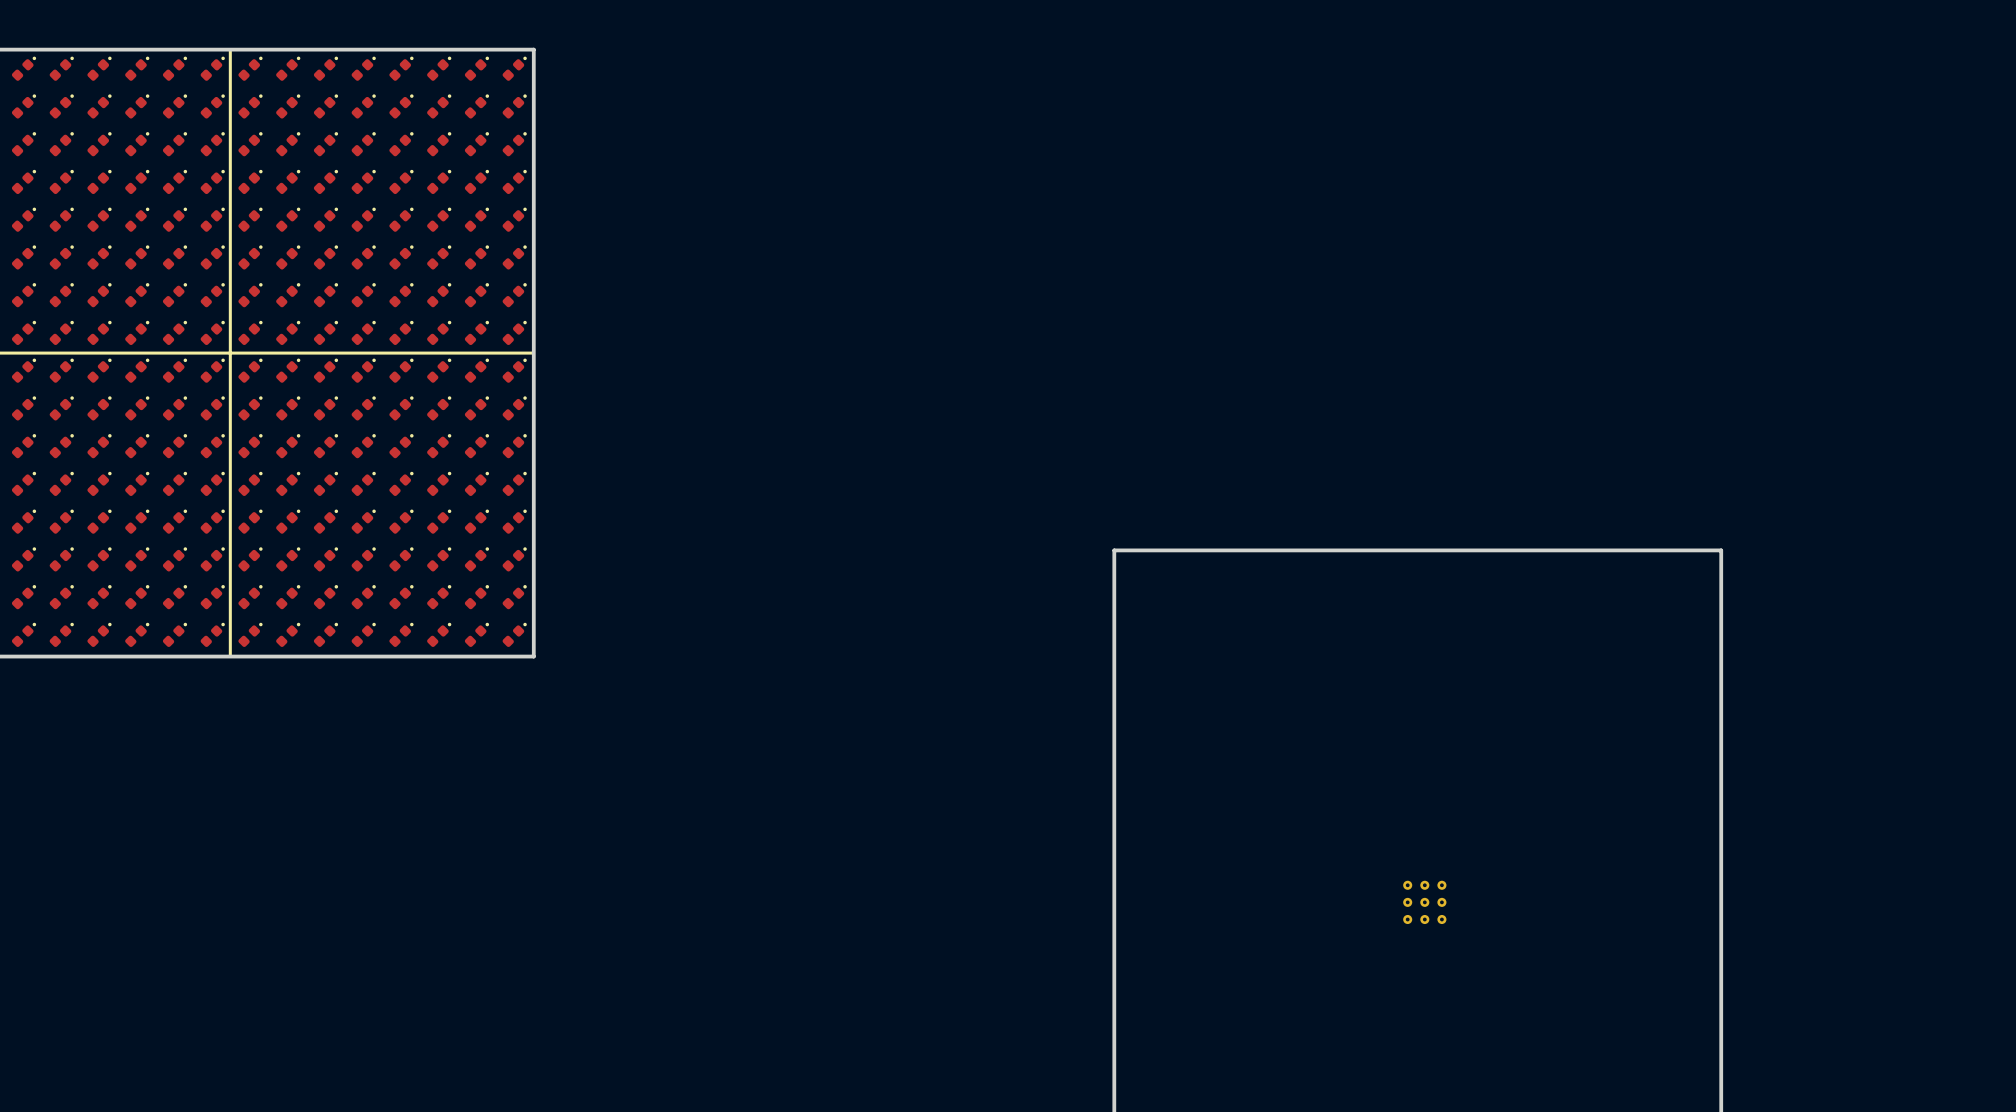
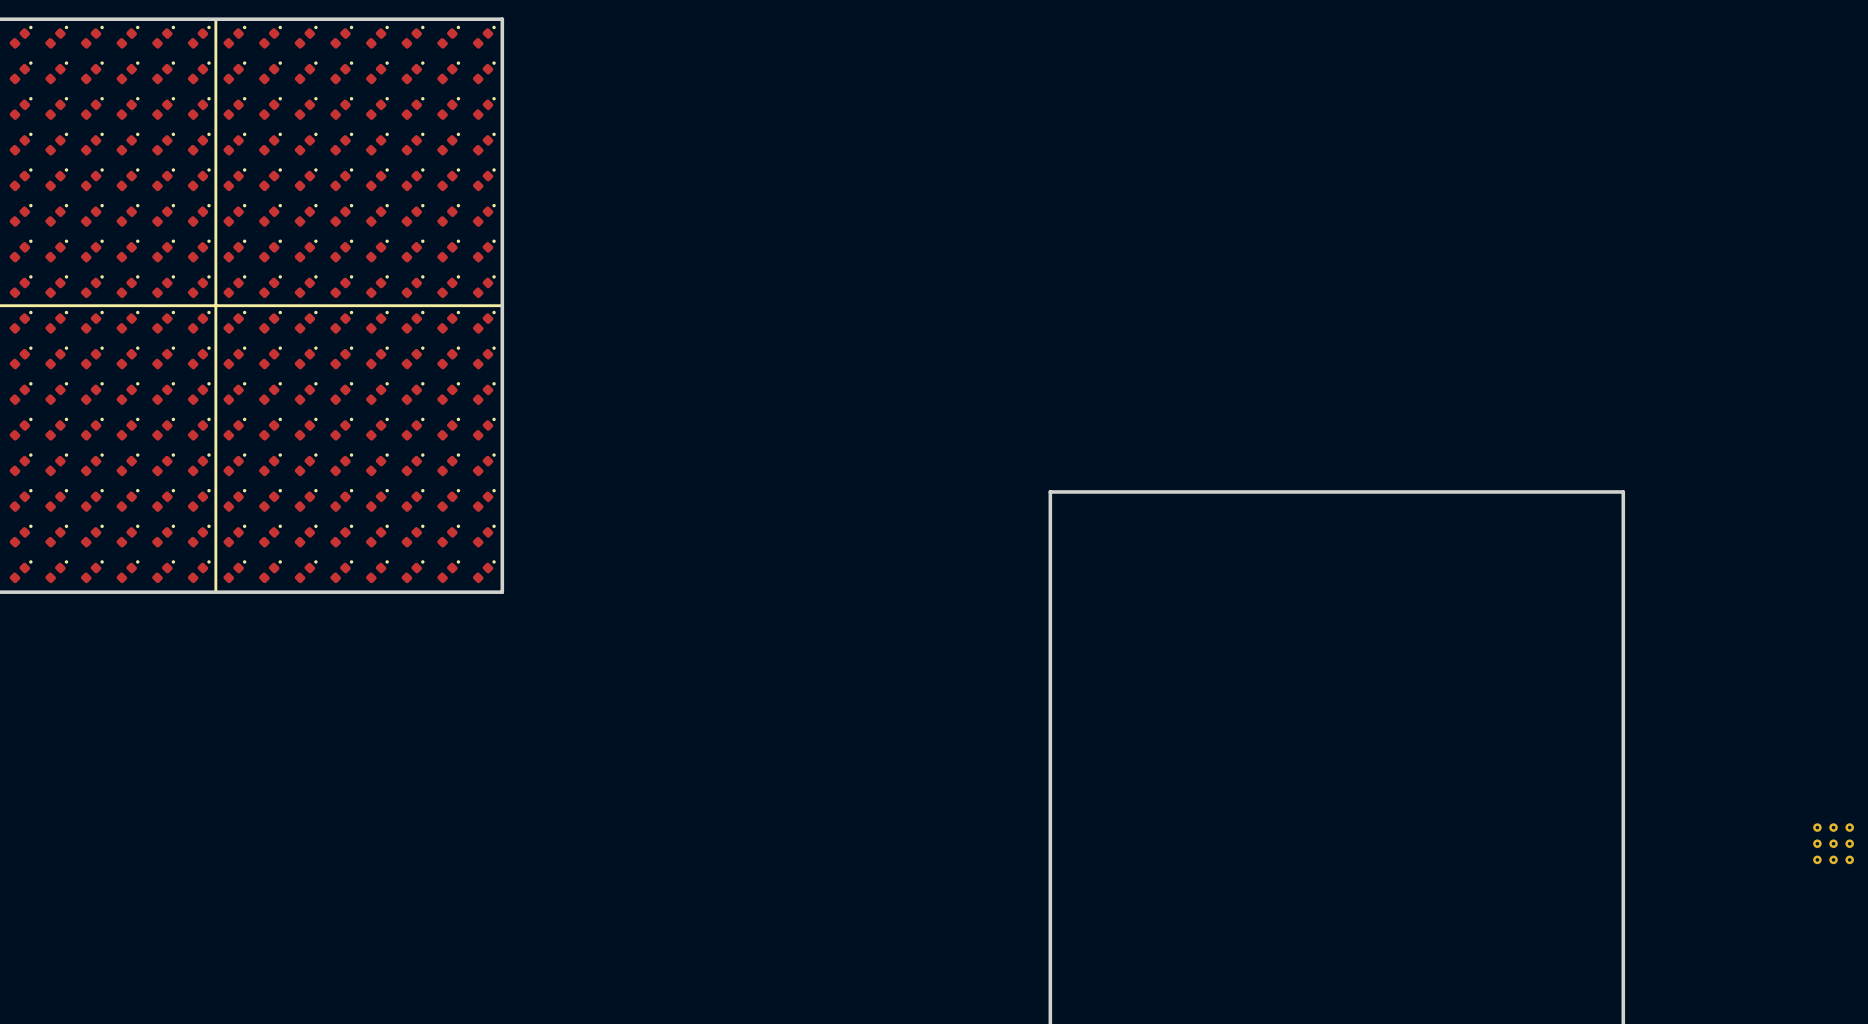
part: (1424, 902) -> none
part: none -> (1833, 843)

